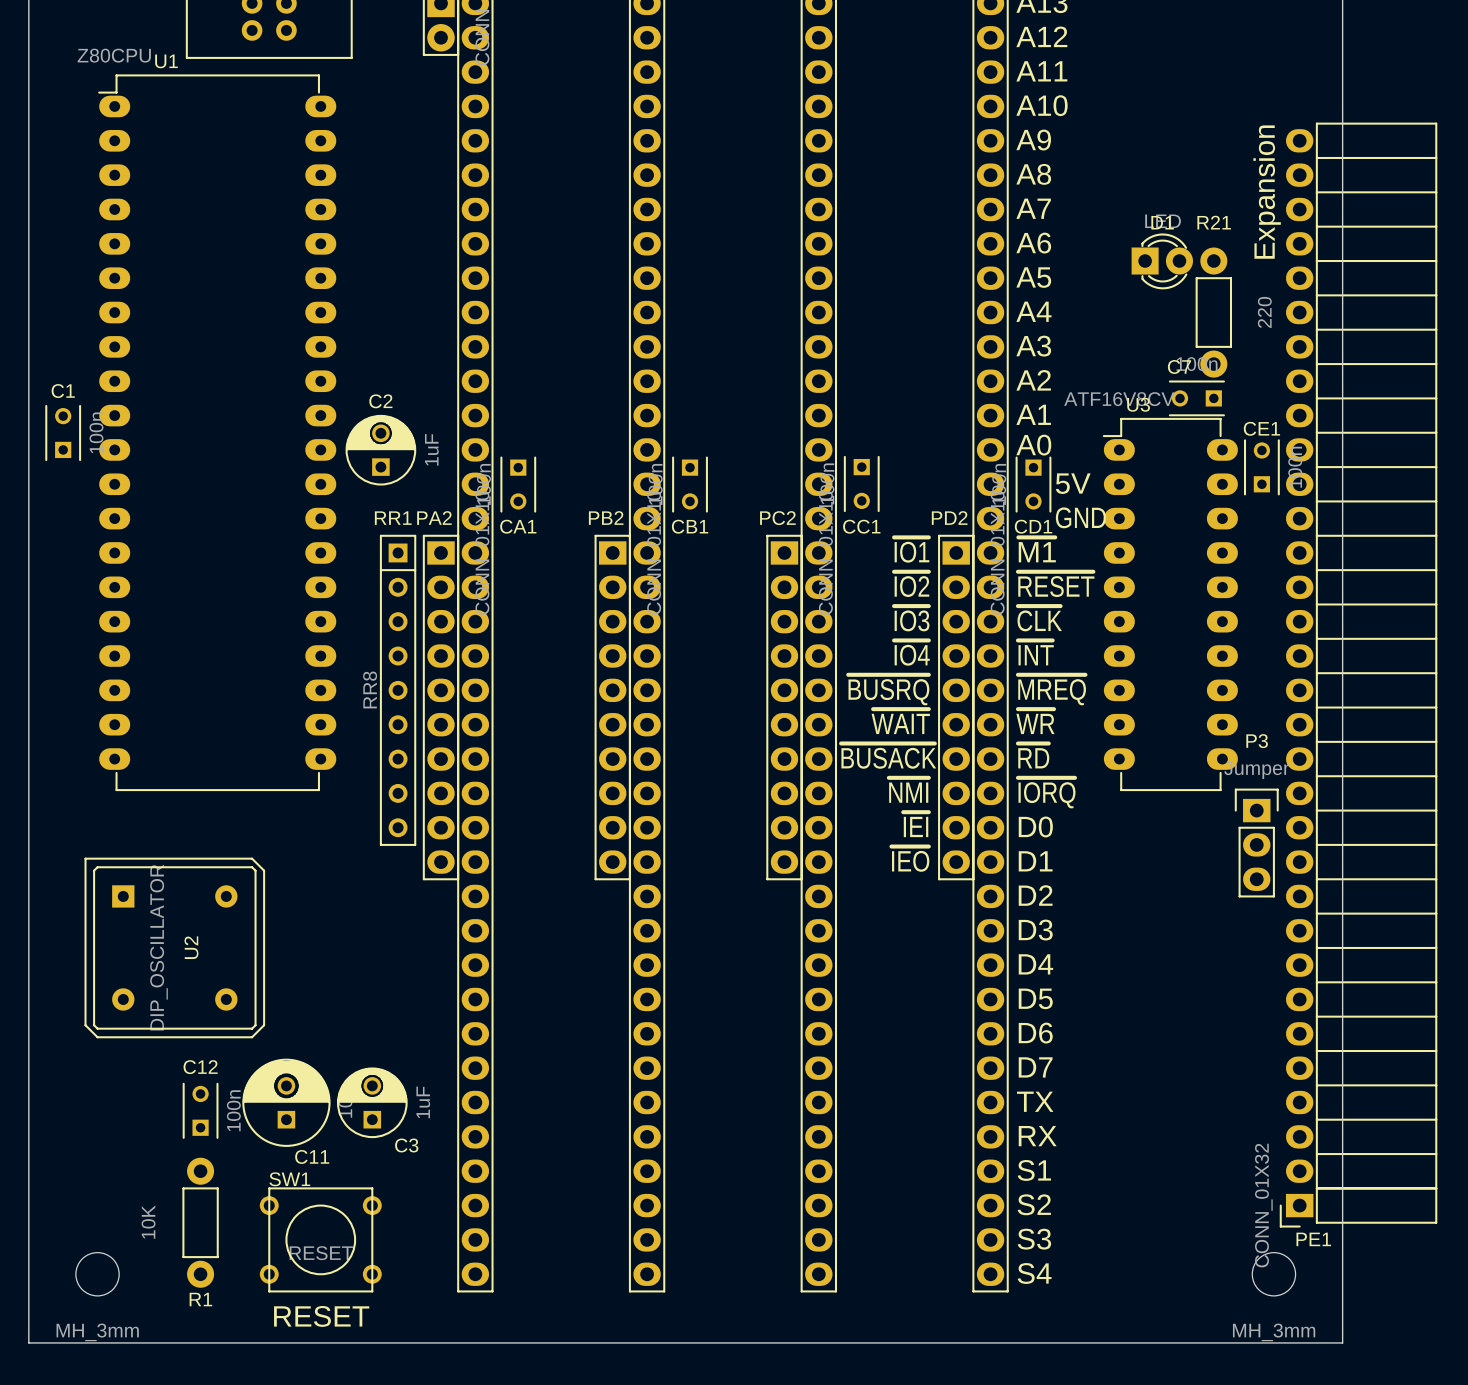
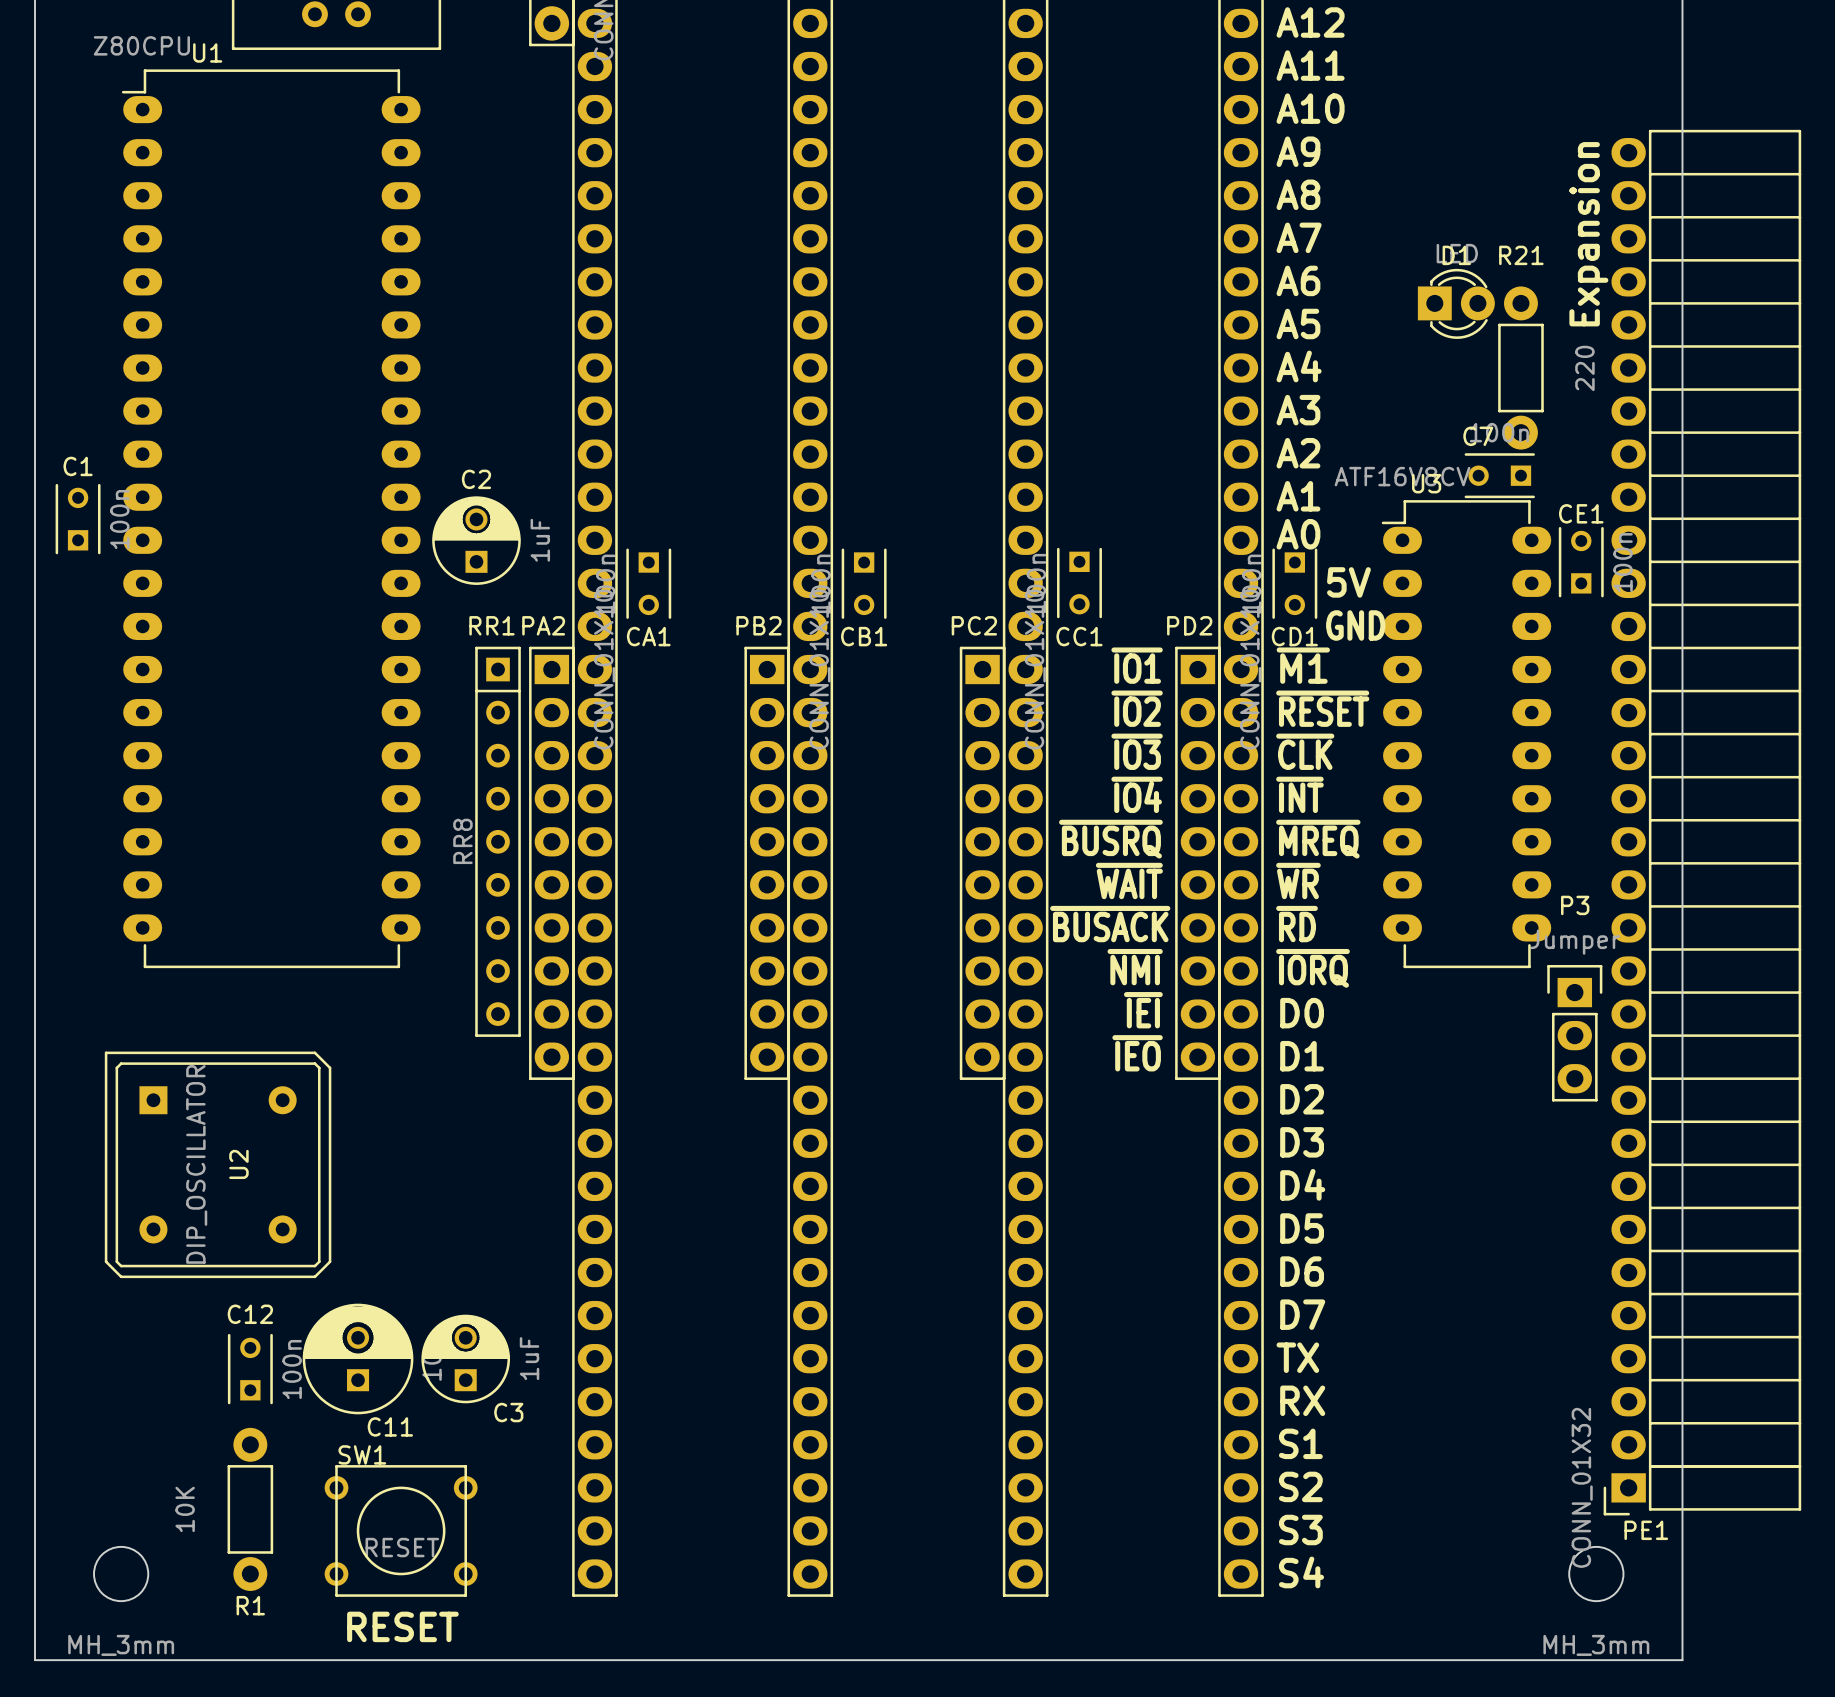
text position: Expansion (1267, 192) -> Expansion (1588, 234)

